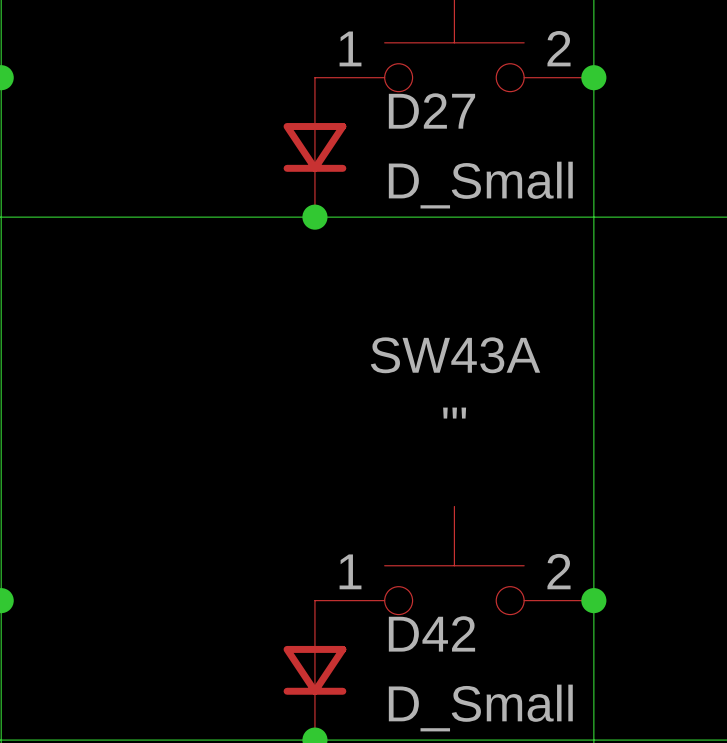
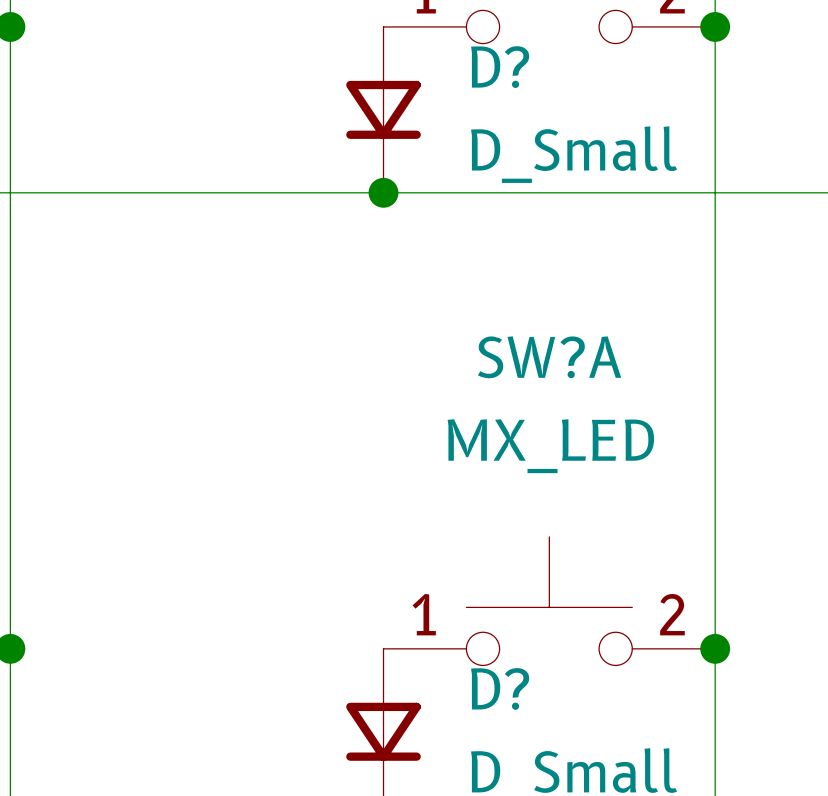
D27 name: D27 (431, 110) -> D? (500, 67)
SW43A name: SW43A (455, 355) -> SW?A (549, 357)
SW43A value: '" (454, 413) -> MX_LED (550, 446)
D42 name: D42 (431, 633) -> D? (500, 688)

